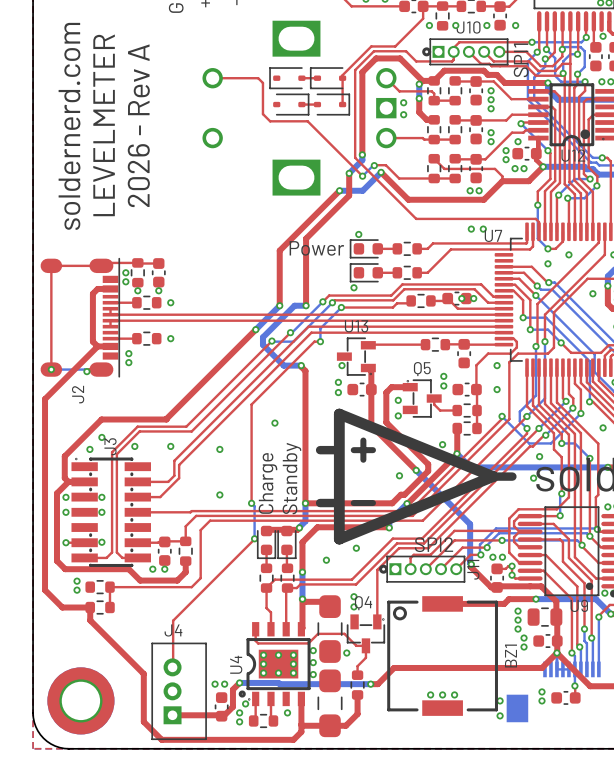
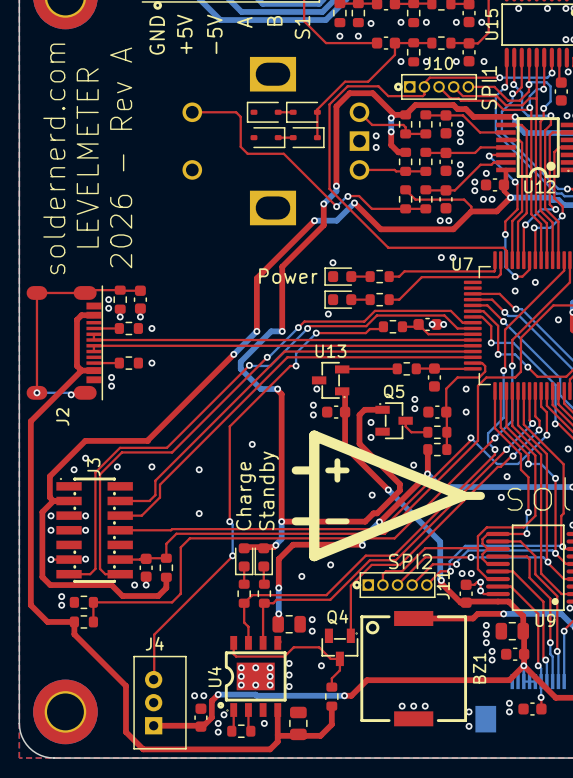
via: (353, 596) -> none
top track: (330, 601) (305, 601) (302, 599) (302, 628) -> none
via: none -> (312, 619)
via: (353, 606) -> none
part: none -> (289, 624)
via: none -> (312, 631)
part: (330, 629) -> none
part: (330, 703) -> none
part: none -> (298, 723)

